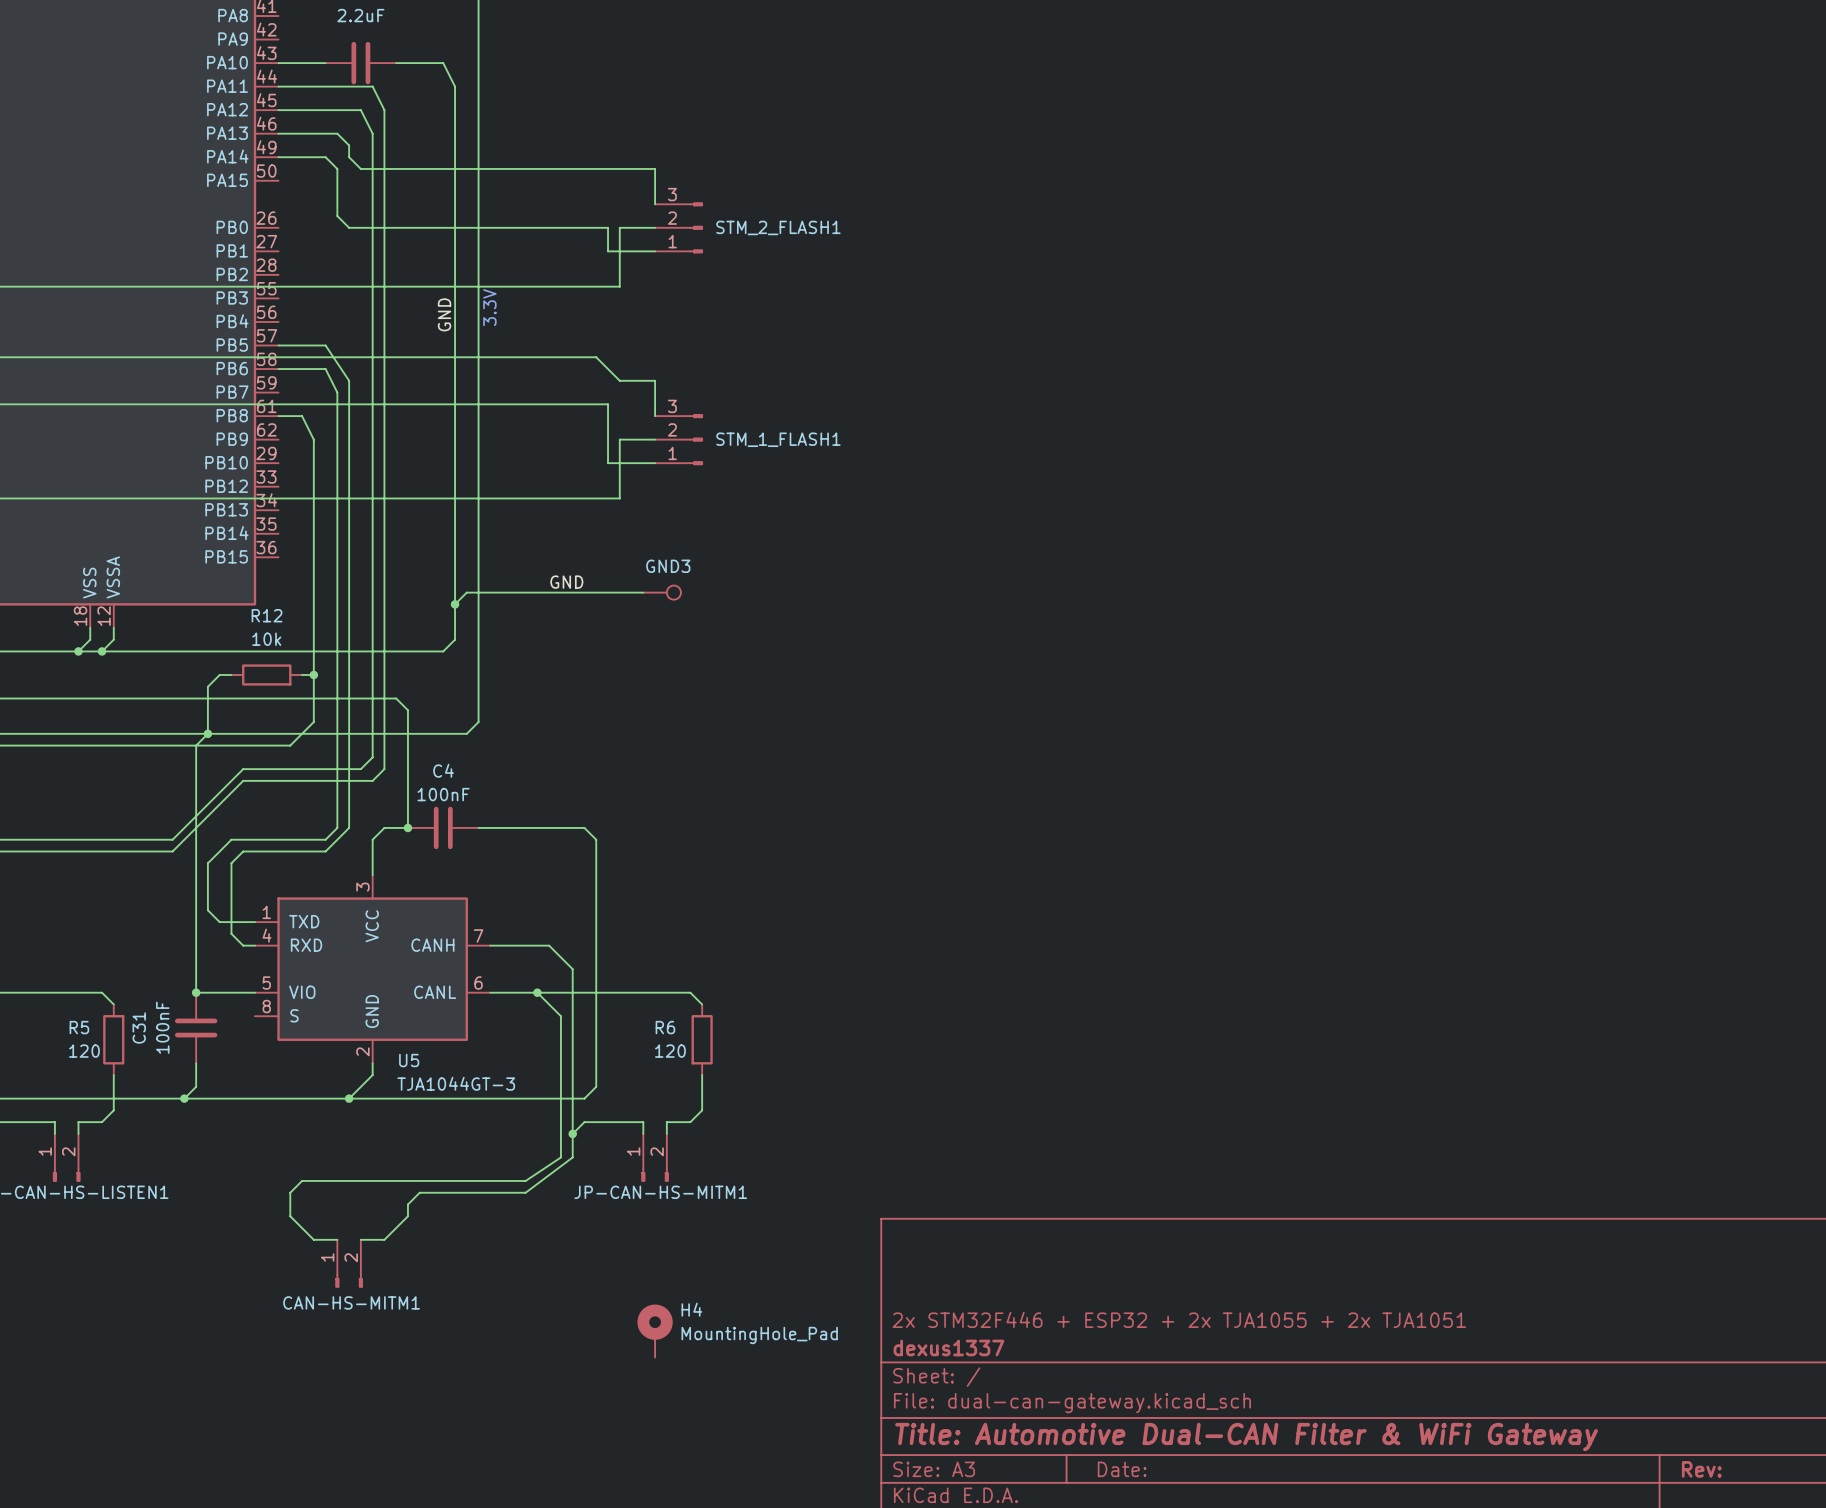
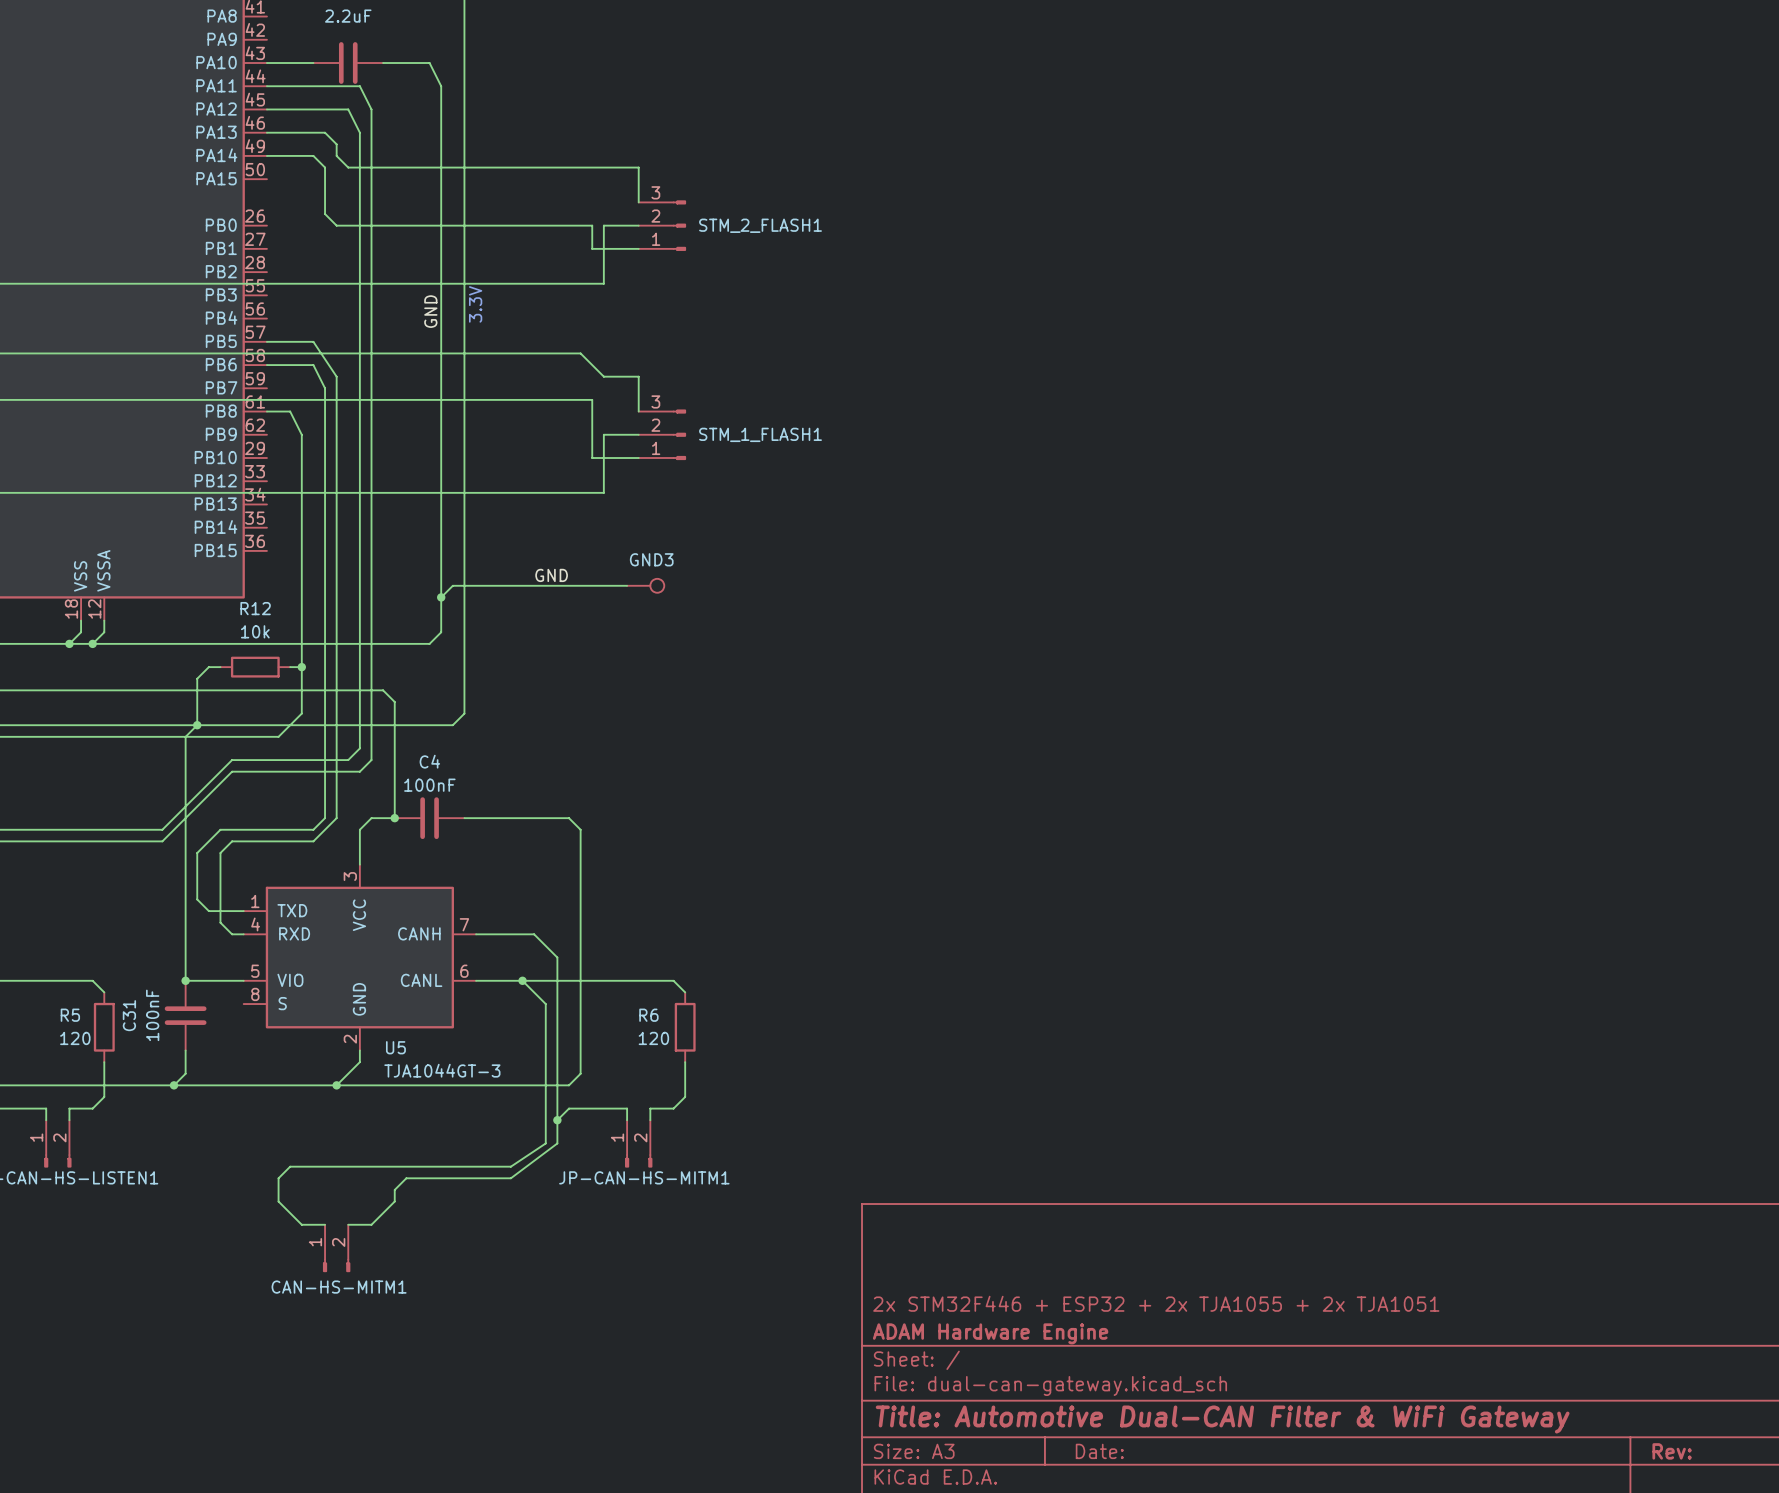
H4: MountingHole_Pad (655, 1331) -> none
title block: dexus1337 (948, 1347) -> ADAM Hardware Engine (990, 1333)

